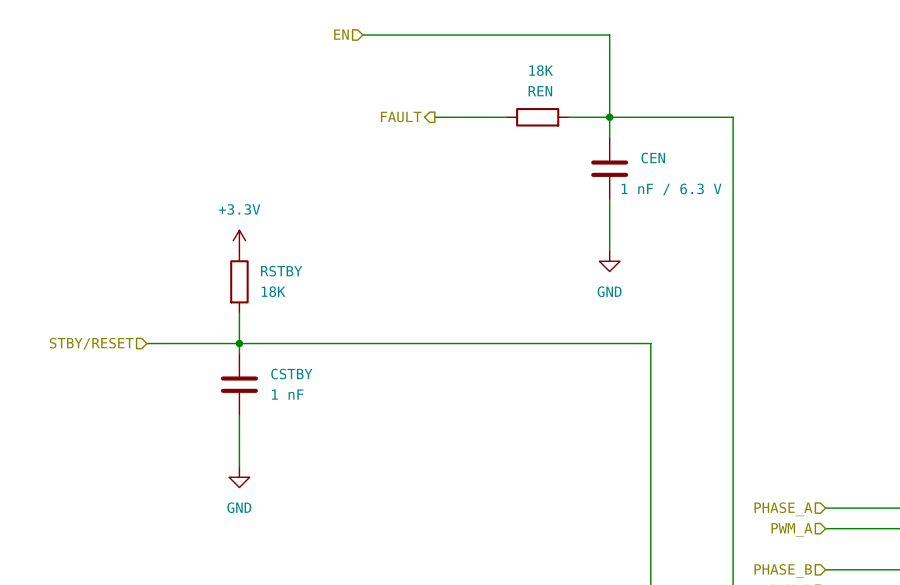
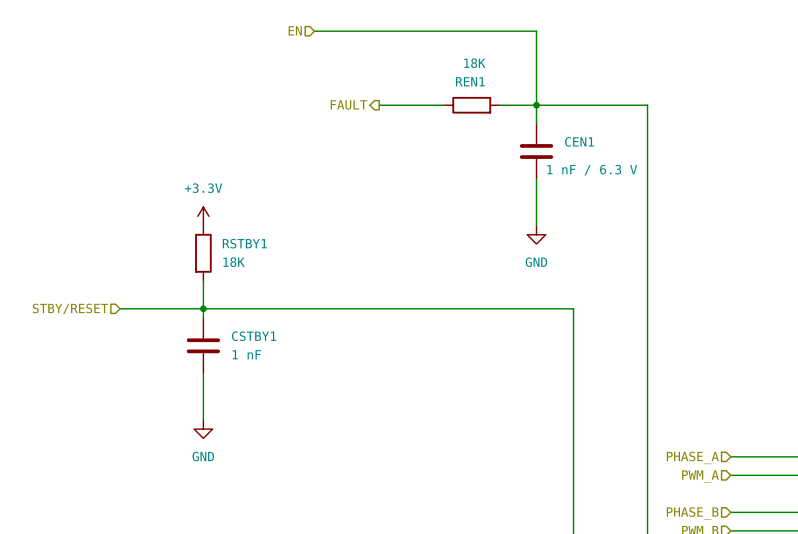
REN name: REN (540, 91) -> REN1 (470, 81)
CEN name: CEN (653, 158) -> CEN1 (579, 141)
RSTBY name: RSTBY (281, 271) -> RSTBY1 (244, 243)
CSTBY name: CSTBY (291, 374) -> CSTBY1 (254, 336)

